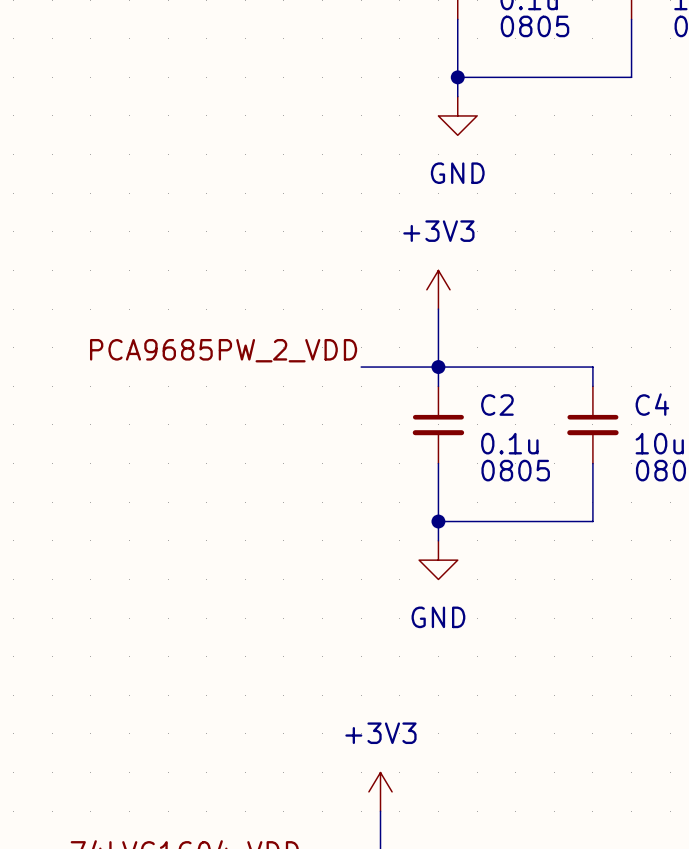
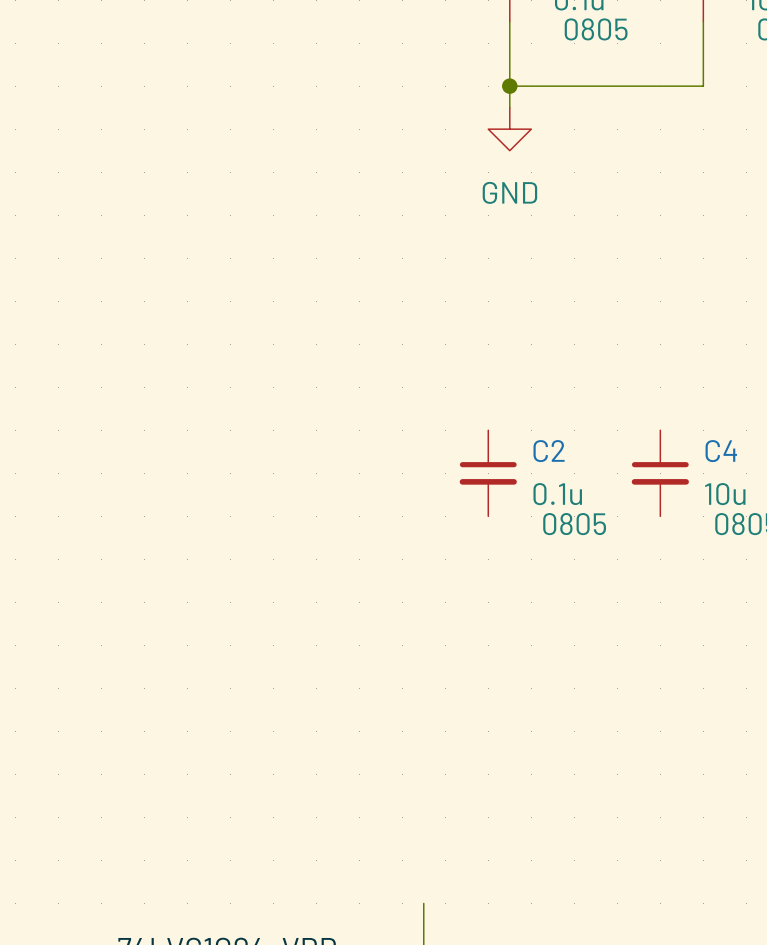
power symbol: +3V3 (438, 289) -> none
wire: (438, 309) (438, 386) -> none
label: PCA9685PW_2_VDD (223, 350) -> none
wire: (361, 367) (592, 367) (592, 386) -> none
junction: (438, 367) -> none
wire: (438, 463) (438, 540) -> none
wire: (592, 463) (592, 521) (438, 521) -> none
junction: (438, 521) -> none
power symbol: GND (438, 560) -> none
power symbol: +3V3 (380, 791) -> none

